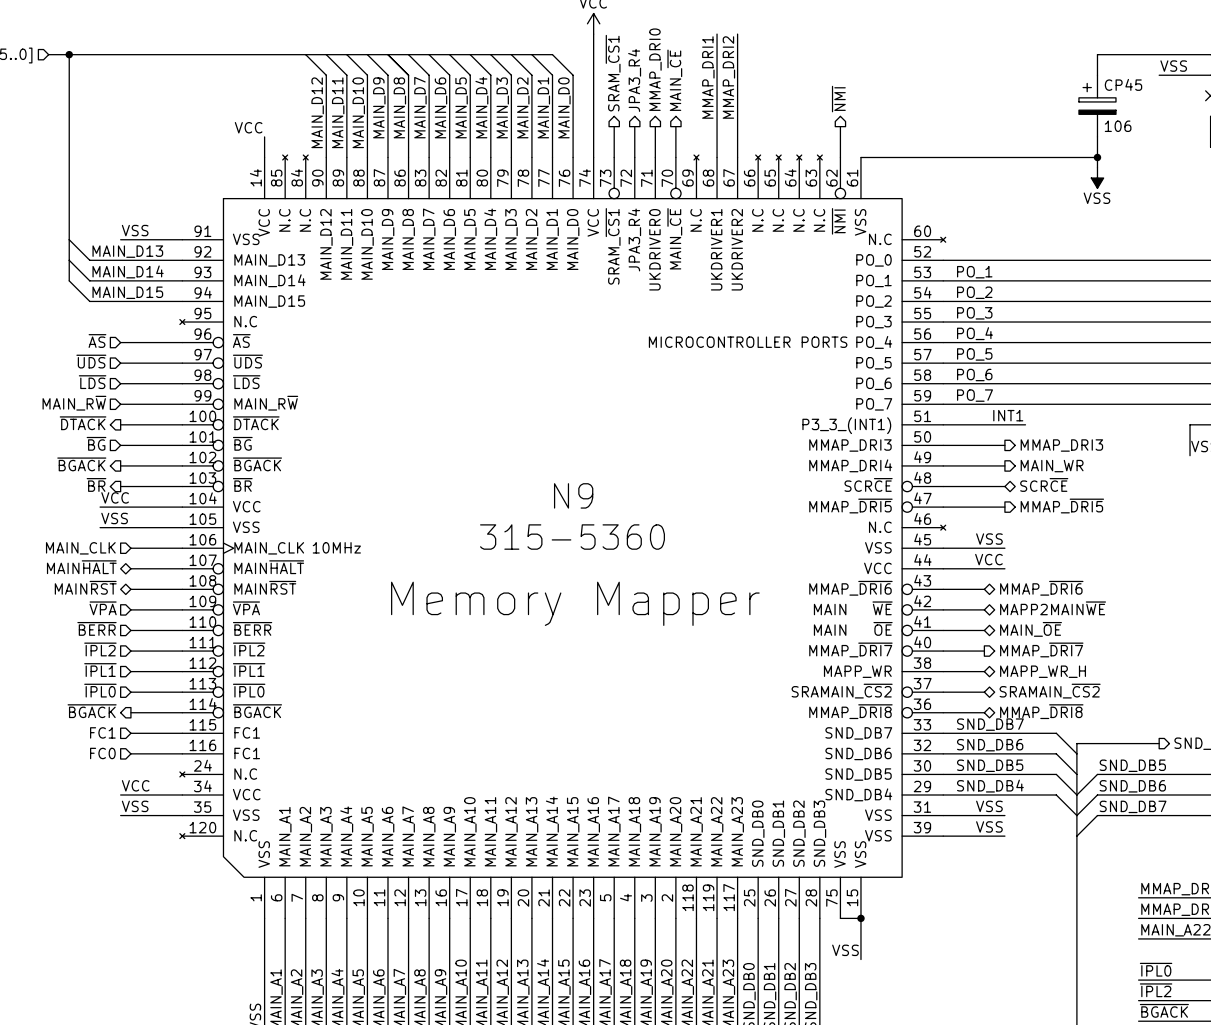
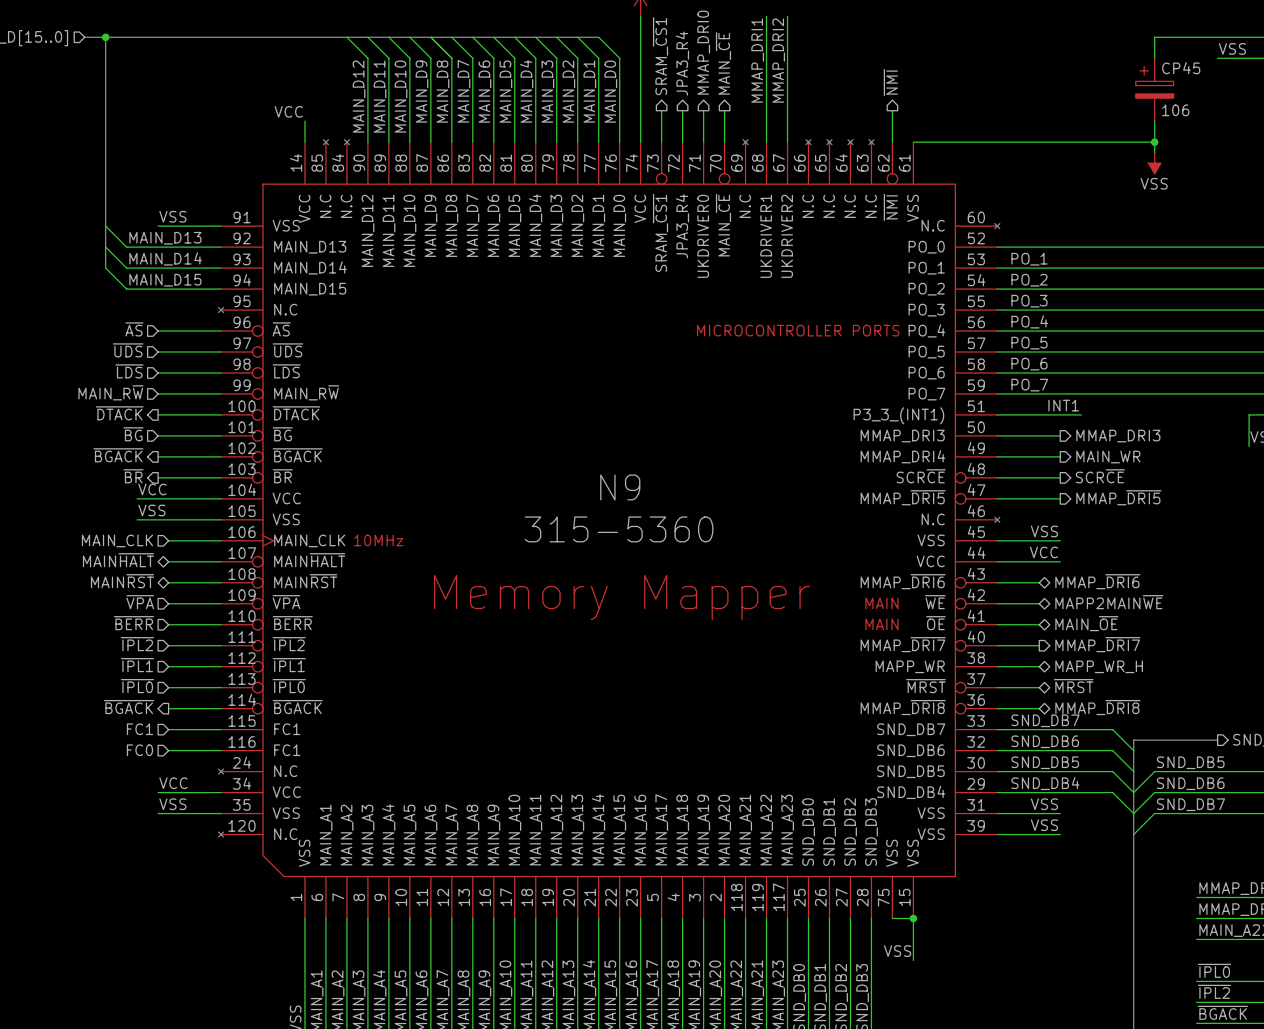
hierarchical label shape: bidirectional (1044, 484) -> output (1100, 476)
N9 pin name: SRAMAIN_~{CS2} (842, 691) -> ~{MRST} (925, 686)
hierarchical label: SRAMAIN_~{CS2} (1050, 691) -> ~{MRST} (1073, 686)

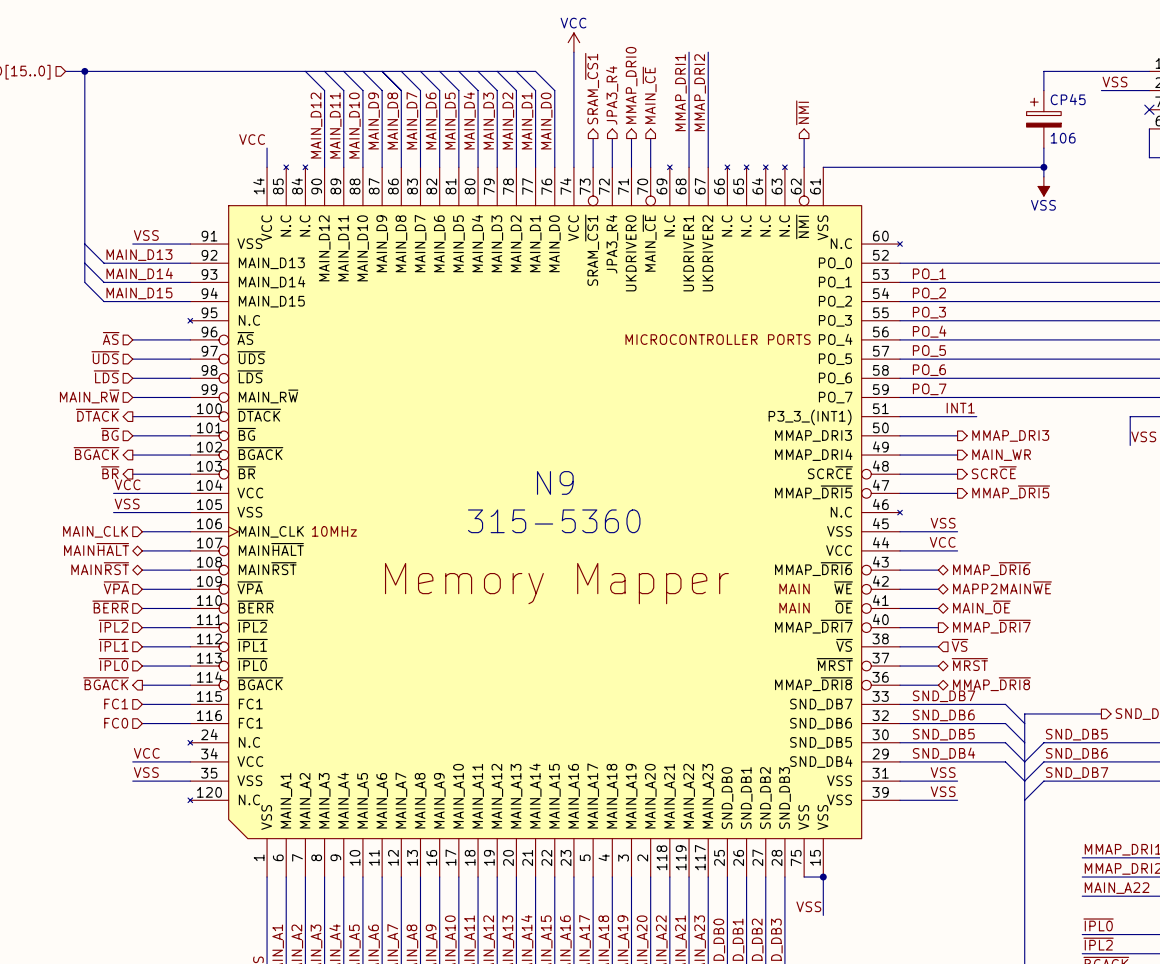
N9 pin name: MAPP_WR (910, 666) -> ~{VS} (844, 645)
hierarchical label shape: bidirectional (1099, 666) -> input (959, 645)
hierarchical label: MAPP_WR_H (1099, 666) -> ~{VS} (959, 645)

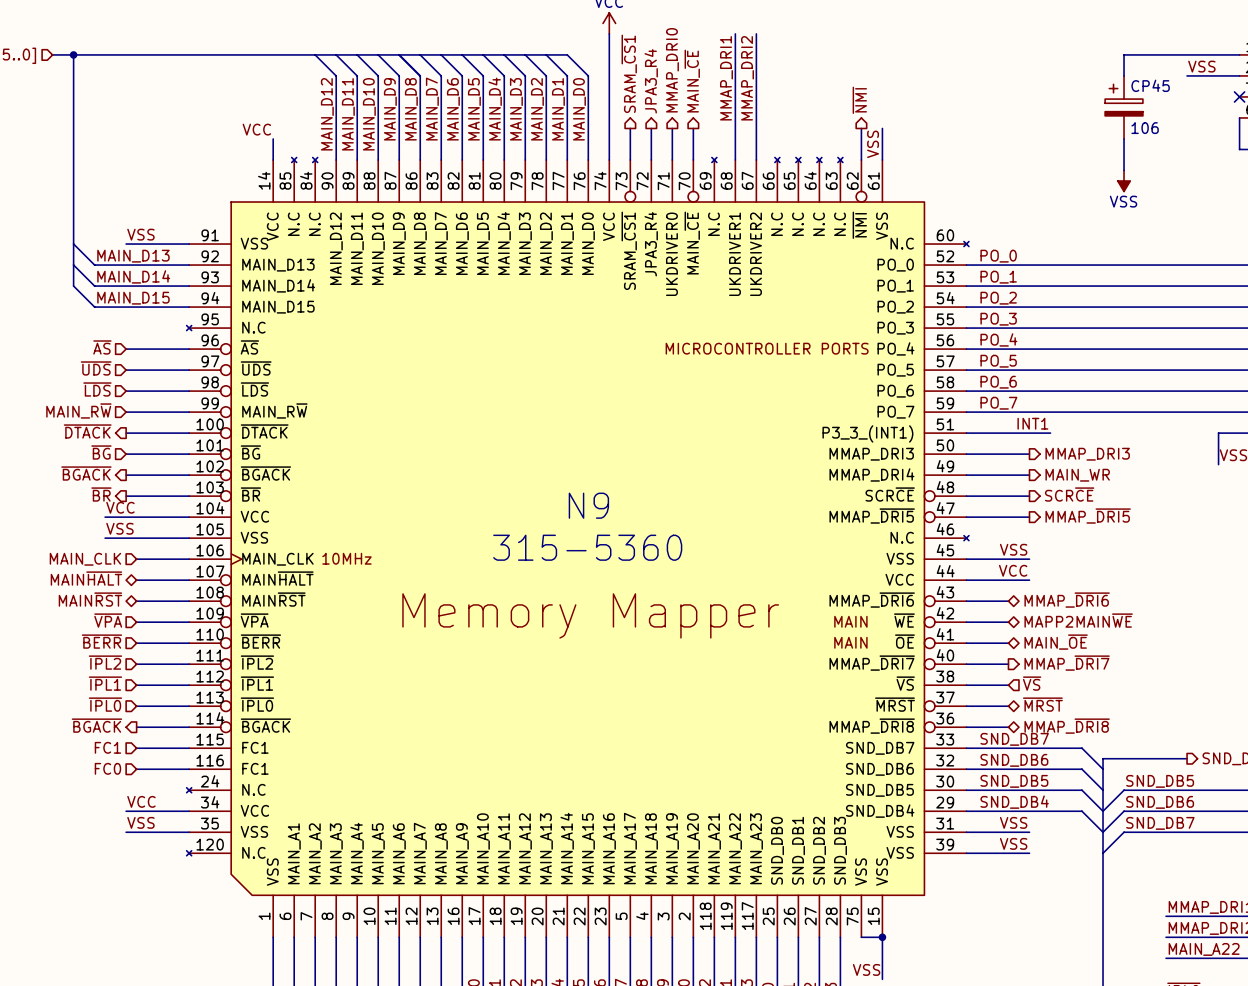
label: none -> VSS (873, 144)
wire: (823, 167) (1043, 167) -> (882, 159) (882, 128)
junction: (1043, 167) -> none
label: none -> PO_0 (998, 256)

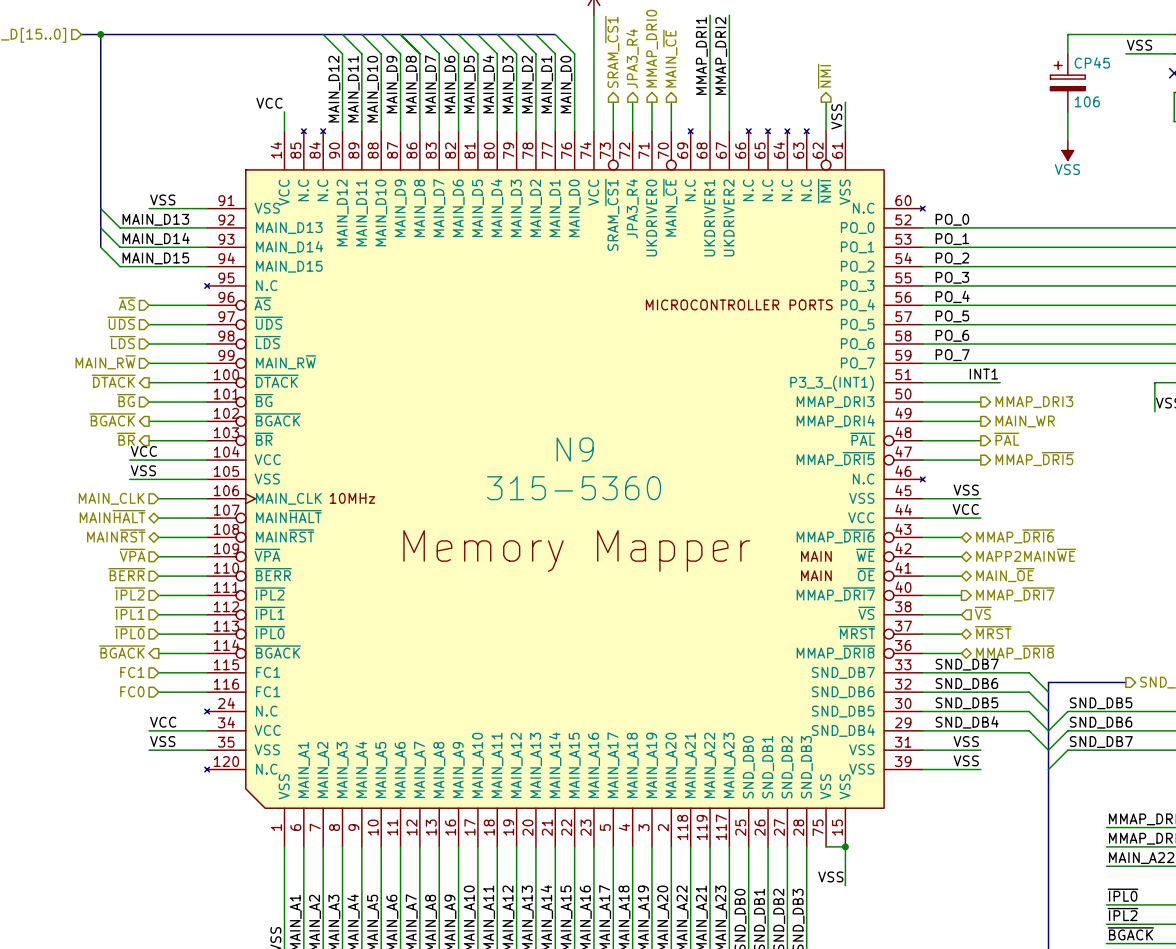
N9 pin name: SCR~{CE} (890, 494) -> ~{PAL} (862, 439)
hierarchical label: SCR~{CE} (1069, 494) -> ~{PAL} (1006, 439)

